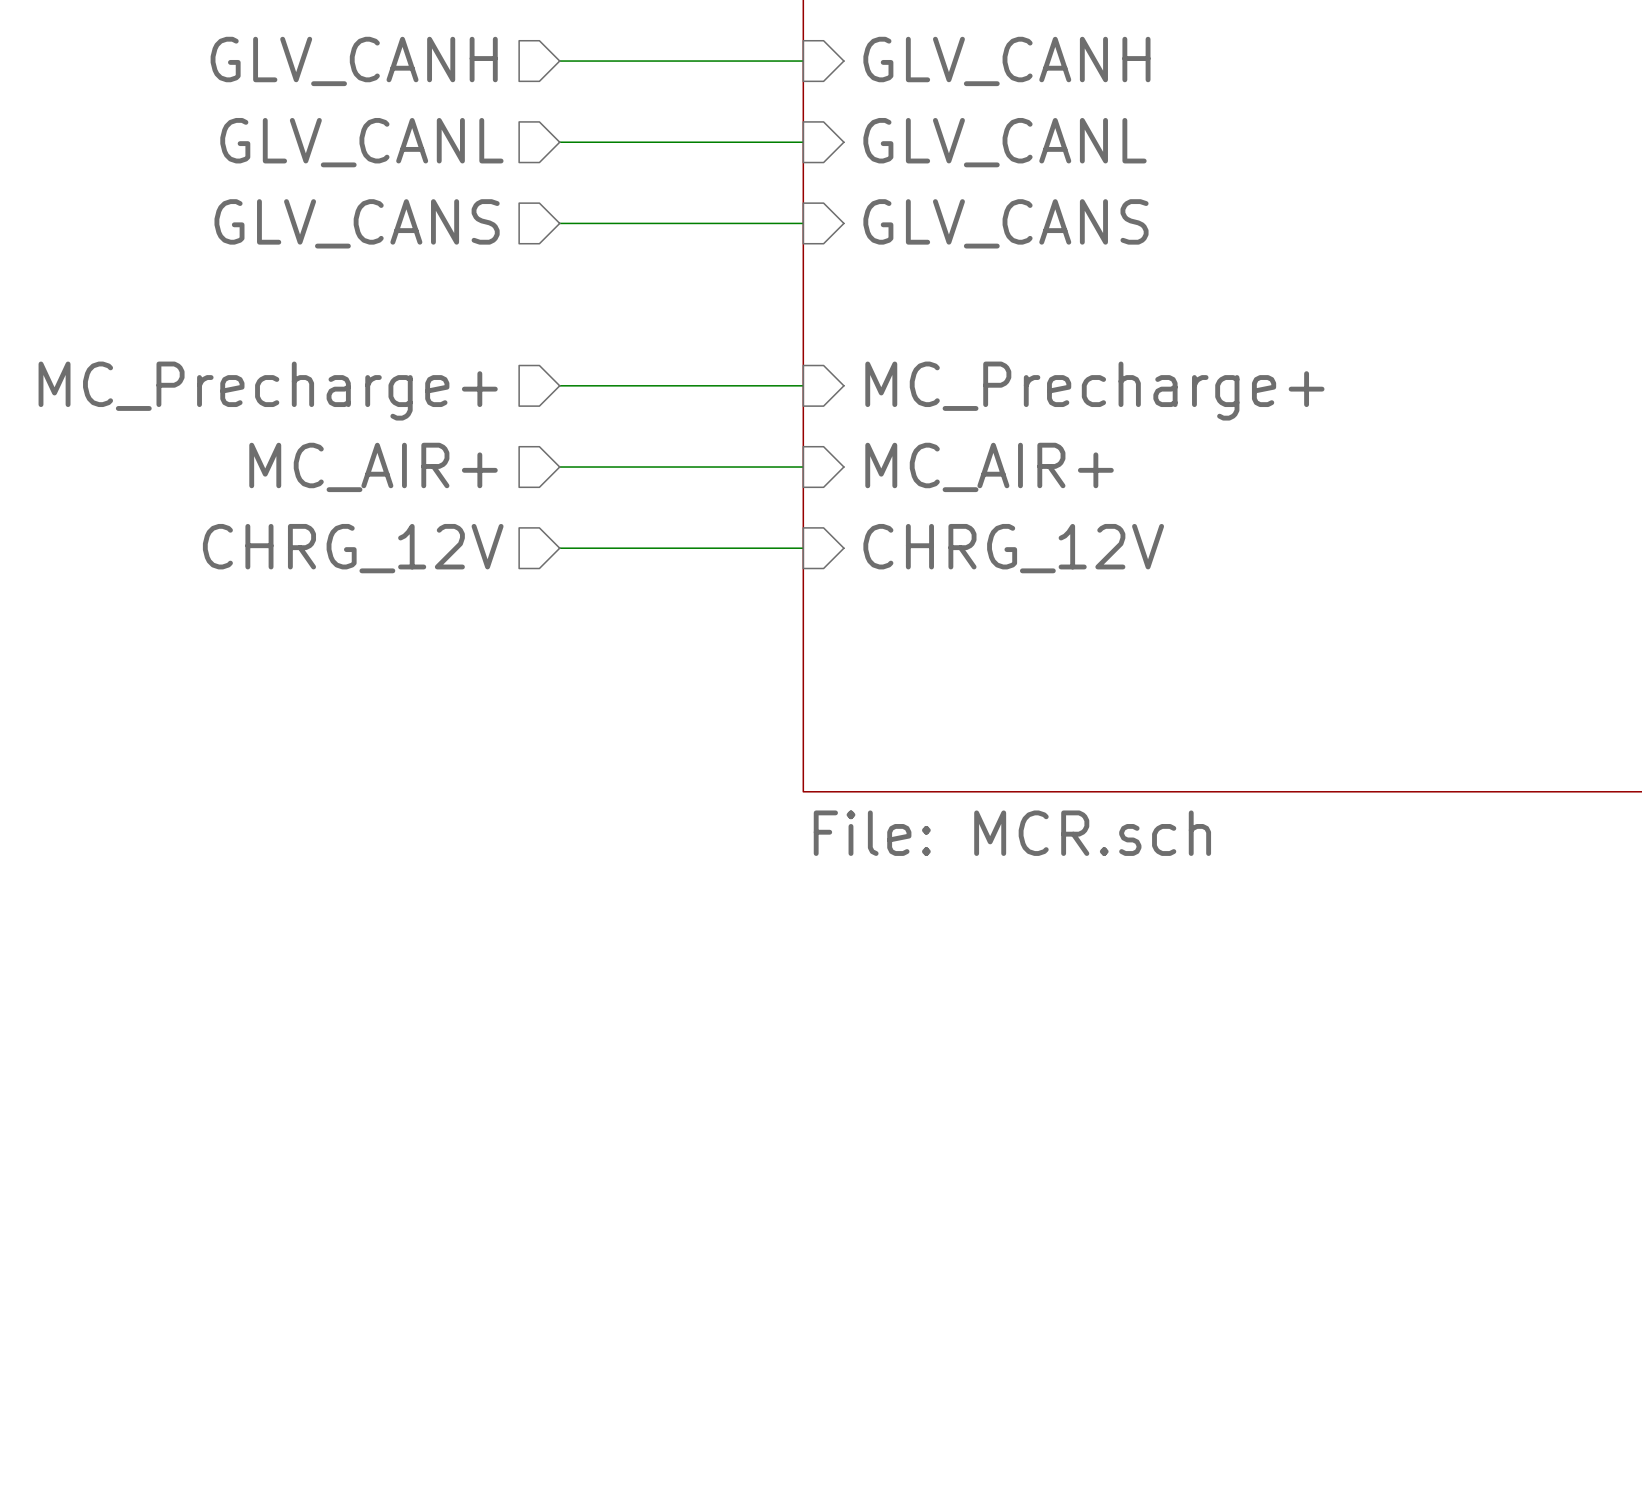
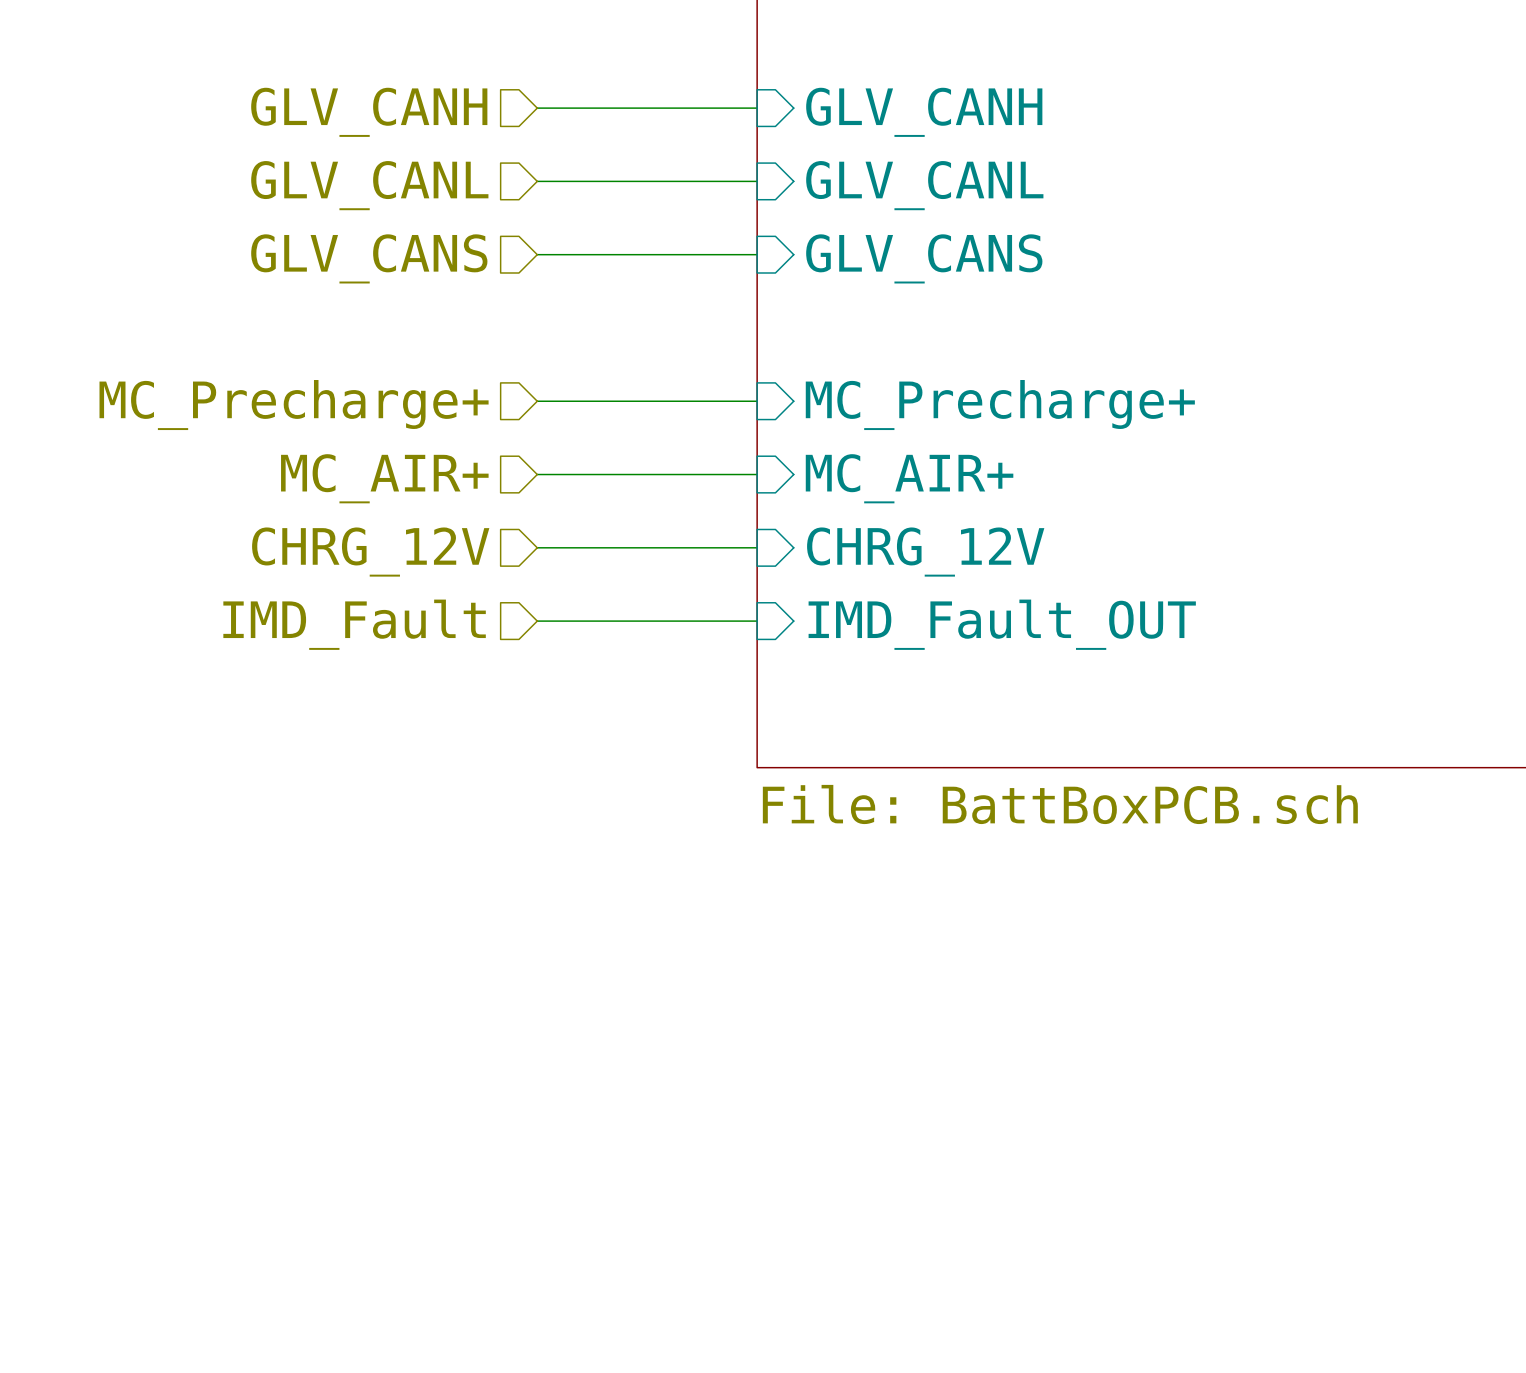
hierarchical label: none -> IMD_Fault (354, 624)
wire: none -> (537, 621) (757, 621)
sheet pin: none -> IMD_Fault_OUT (1002, 624)
sheet value: File: MCR.sch (1012, 833) -> File: BattBoxPCB.sch (1060, 804)

